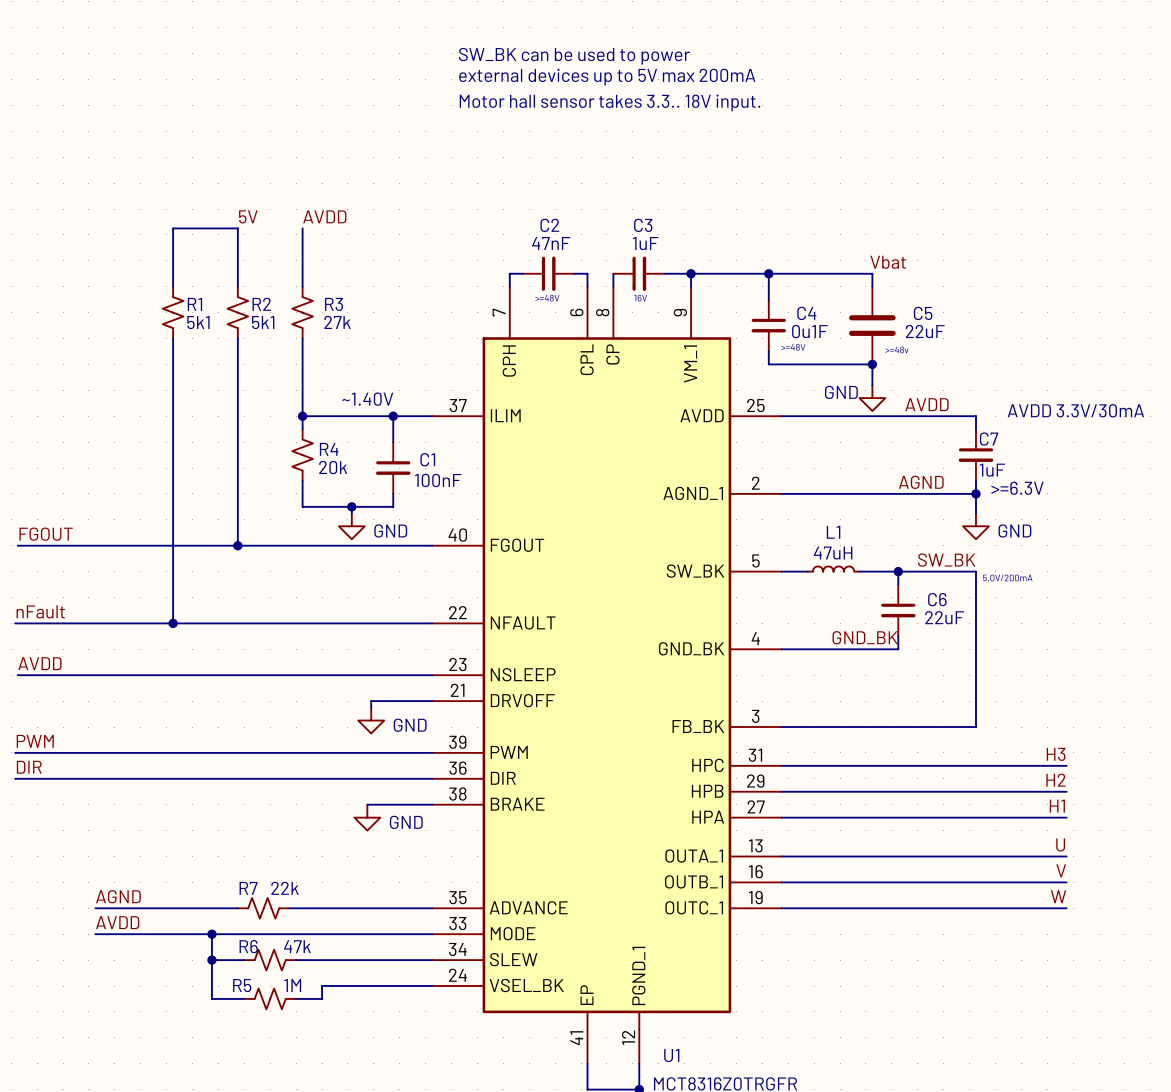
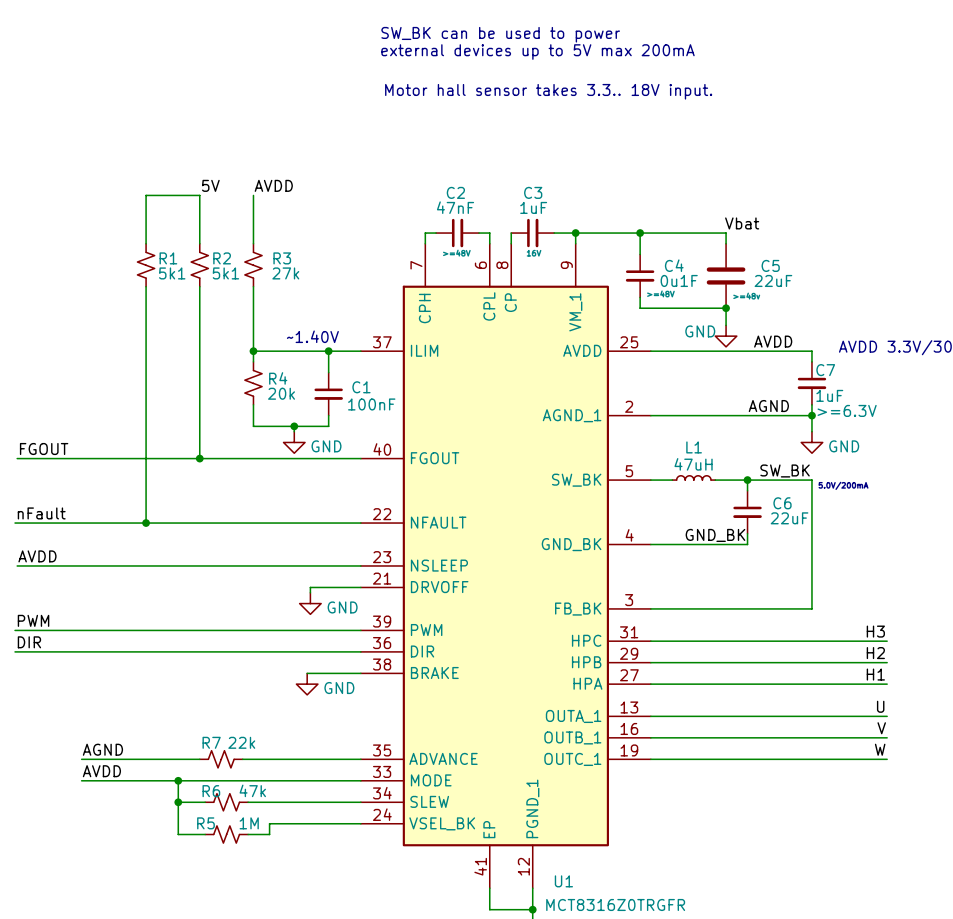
text: none -> SW_BK can be used to power (500, 34)
text: SW_BK can be used to power (574, 56) -> external devices up to 5V max 200mA (538, 52)
text: external devices up to 5V max 200mA (607, 77) -> none

